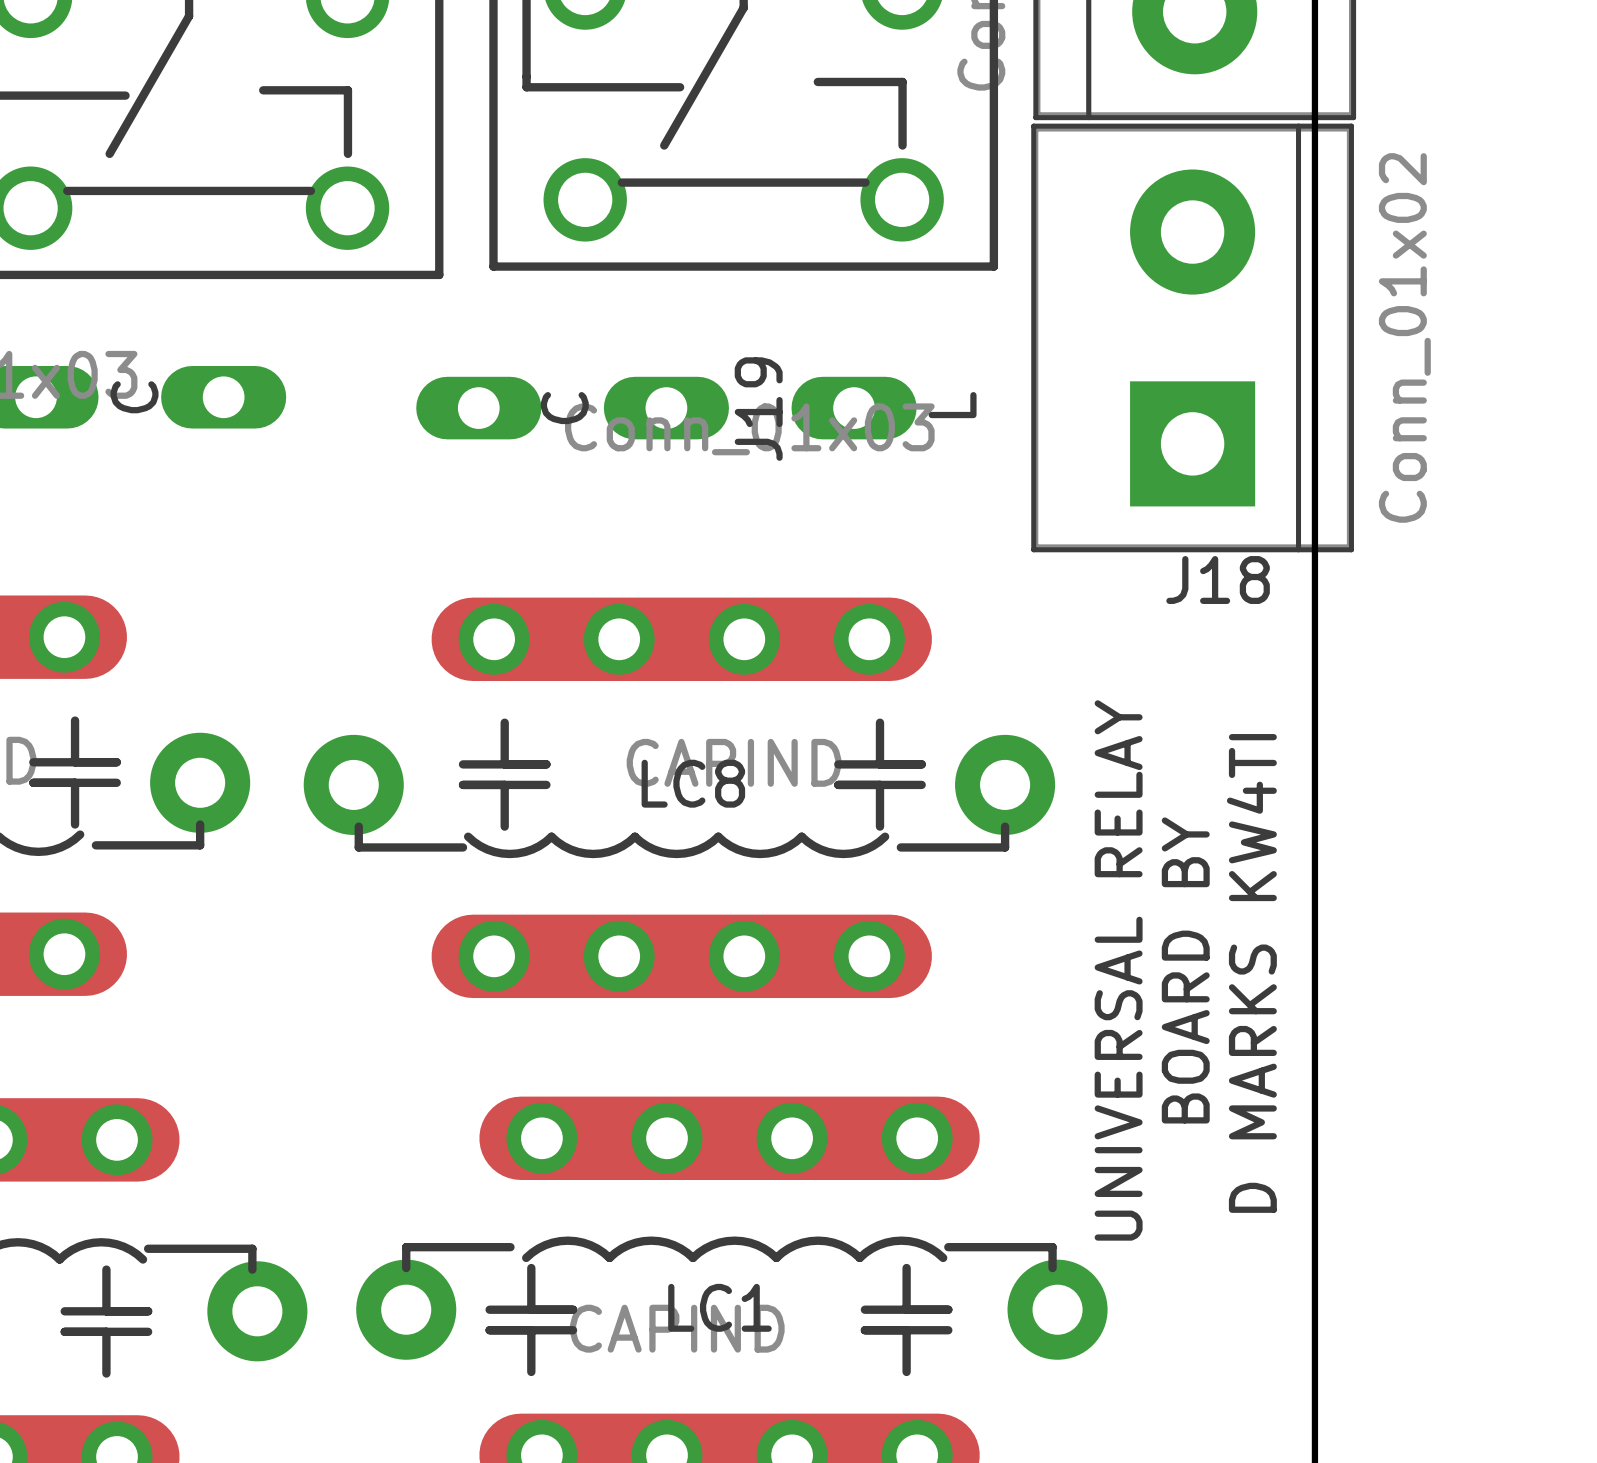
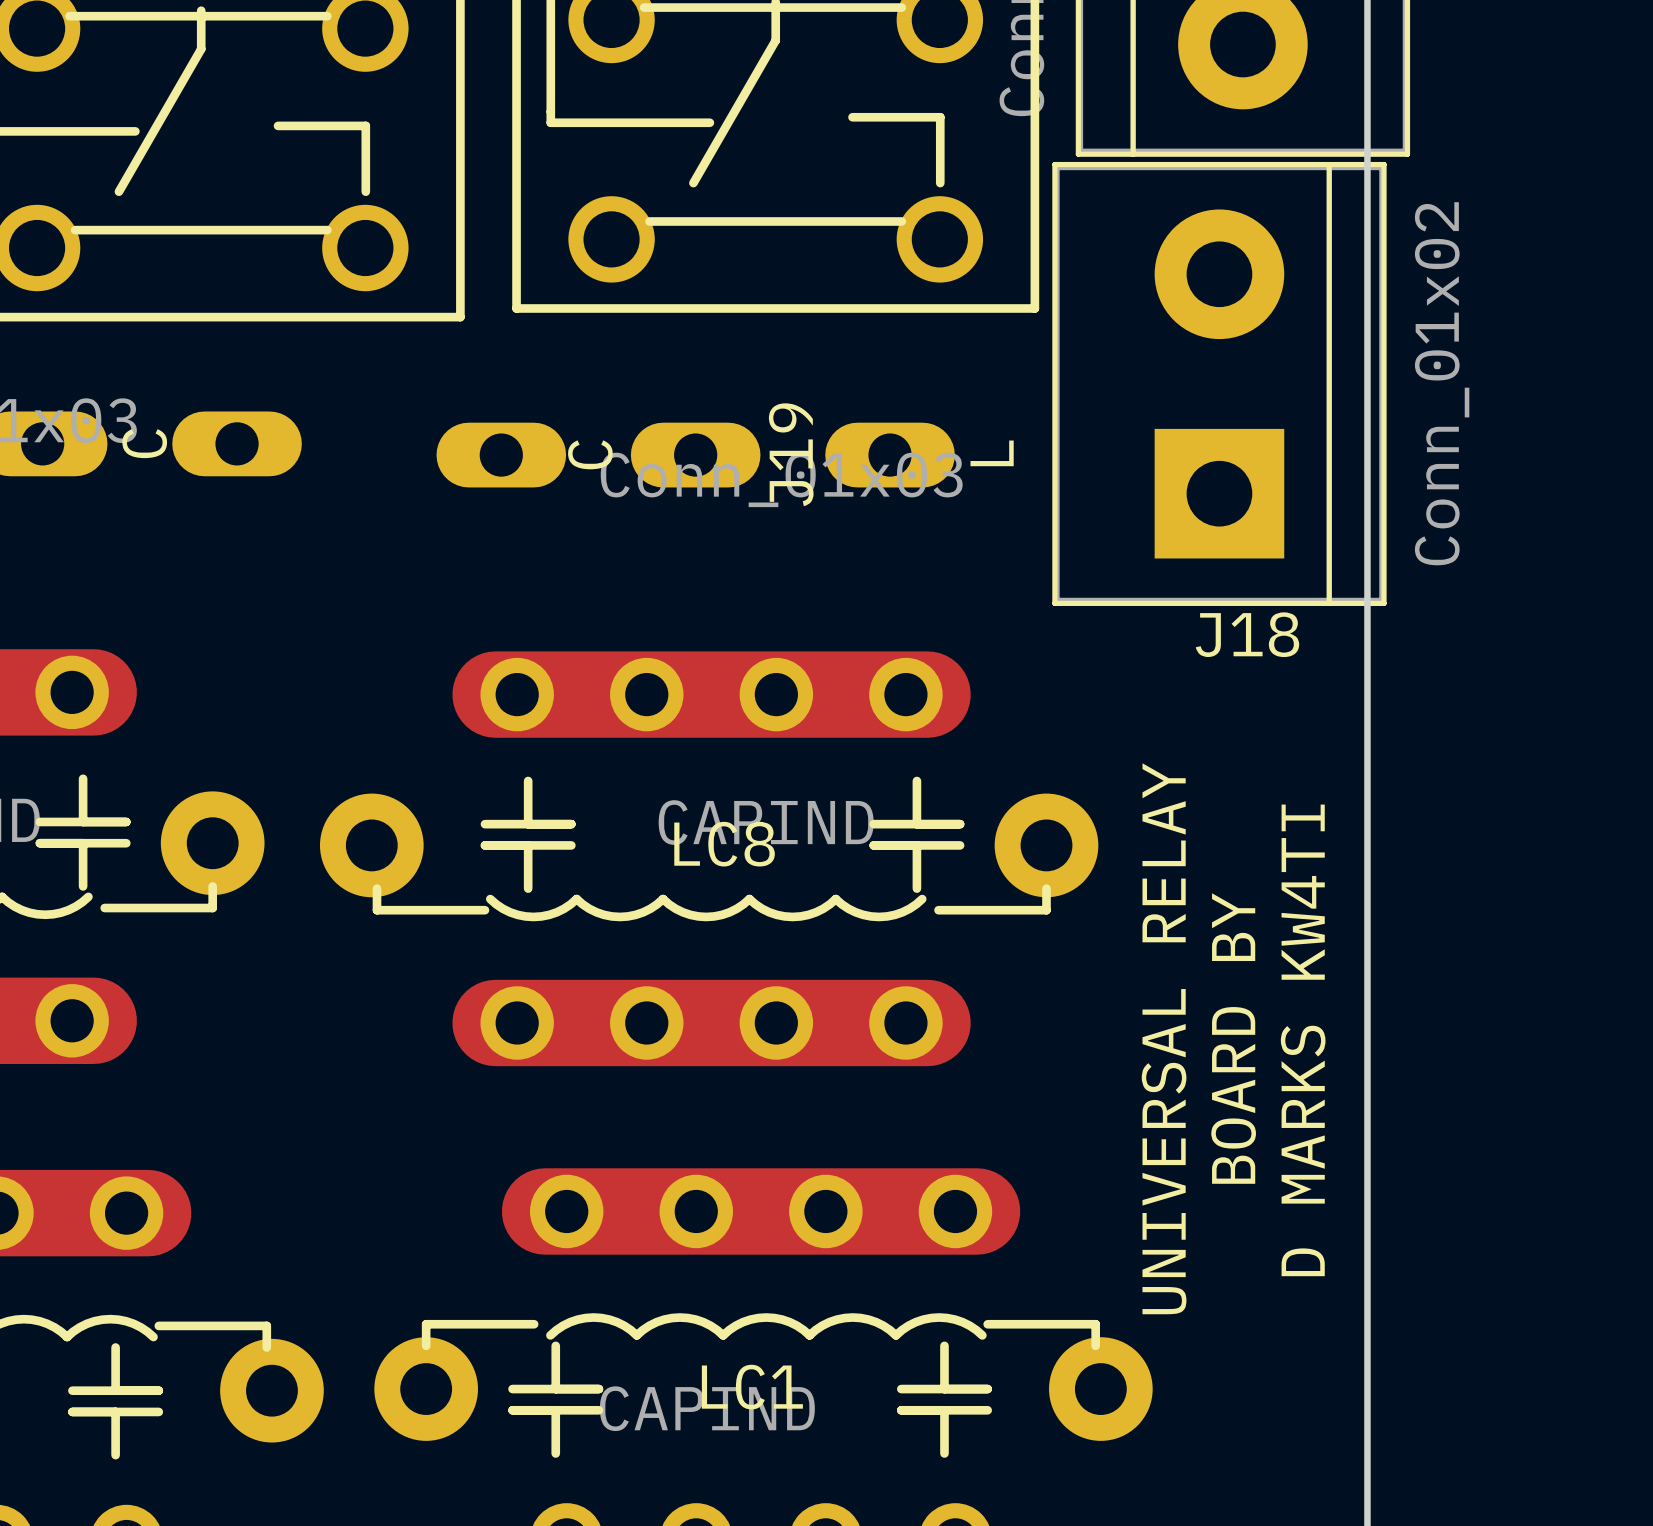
J18 position: (1192, 337) -> (1219, 383)

